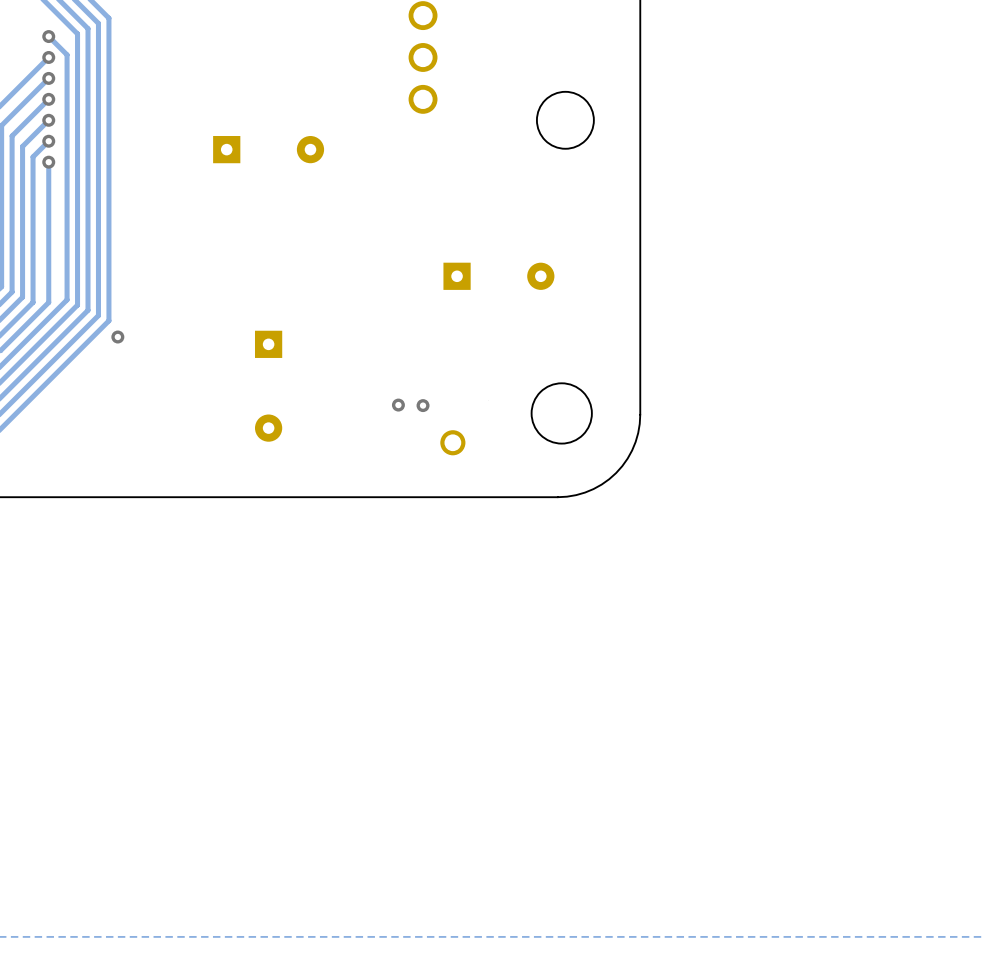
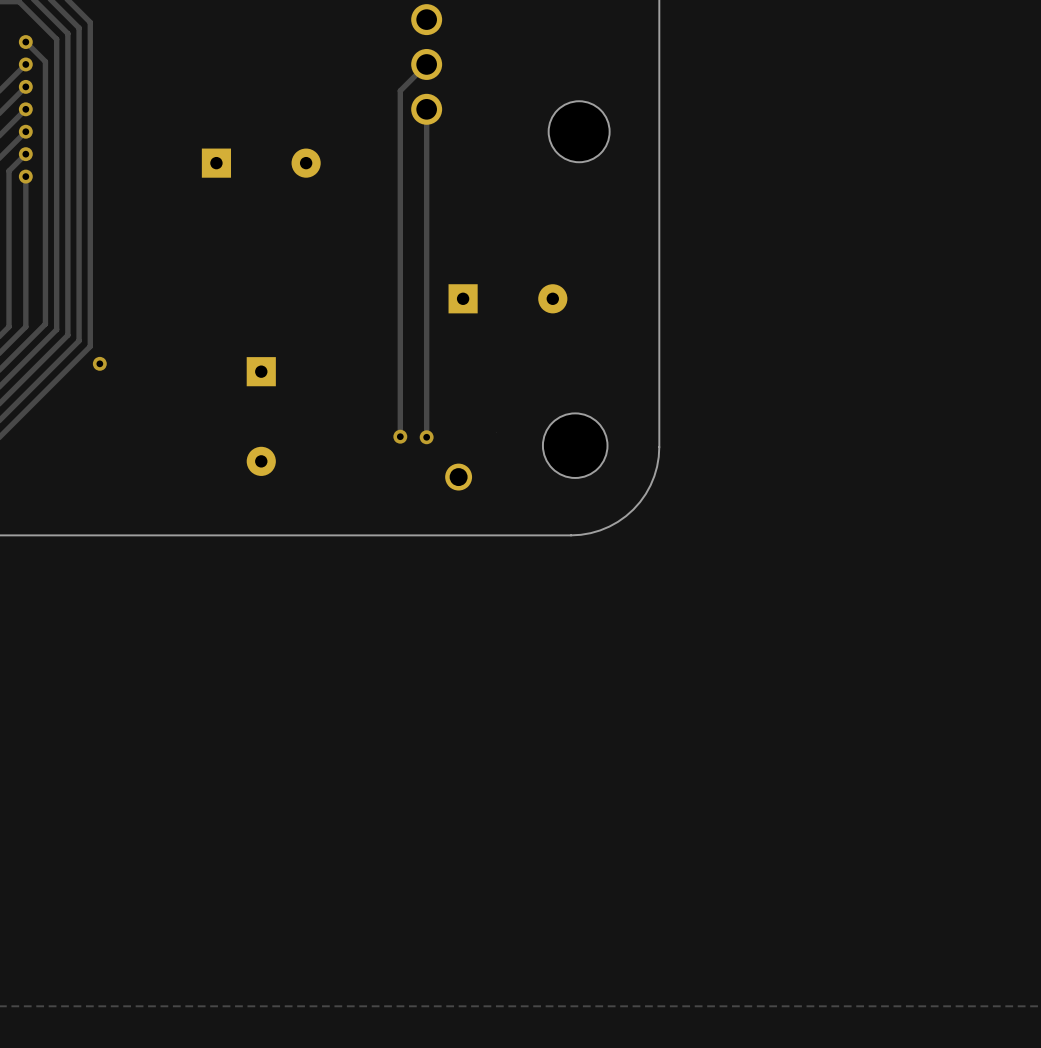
track: none -> (426, 64) (400, 90) (400, 436)
track: none -> (426, 109) (426, 437)

